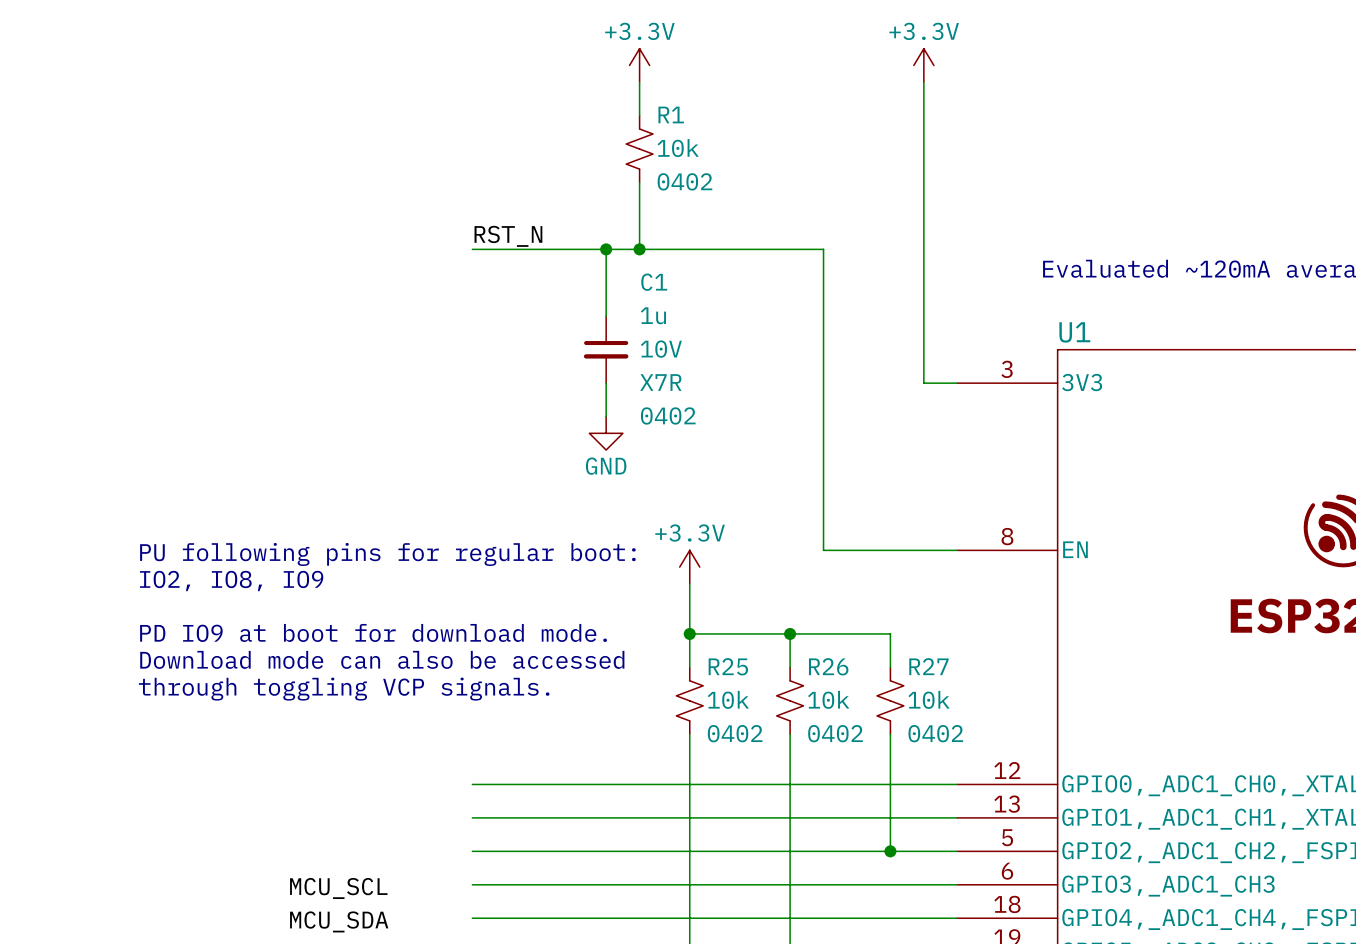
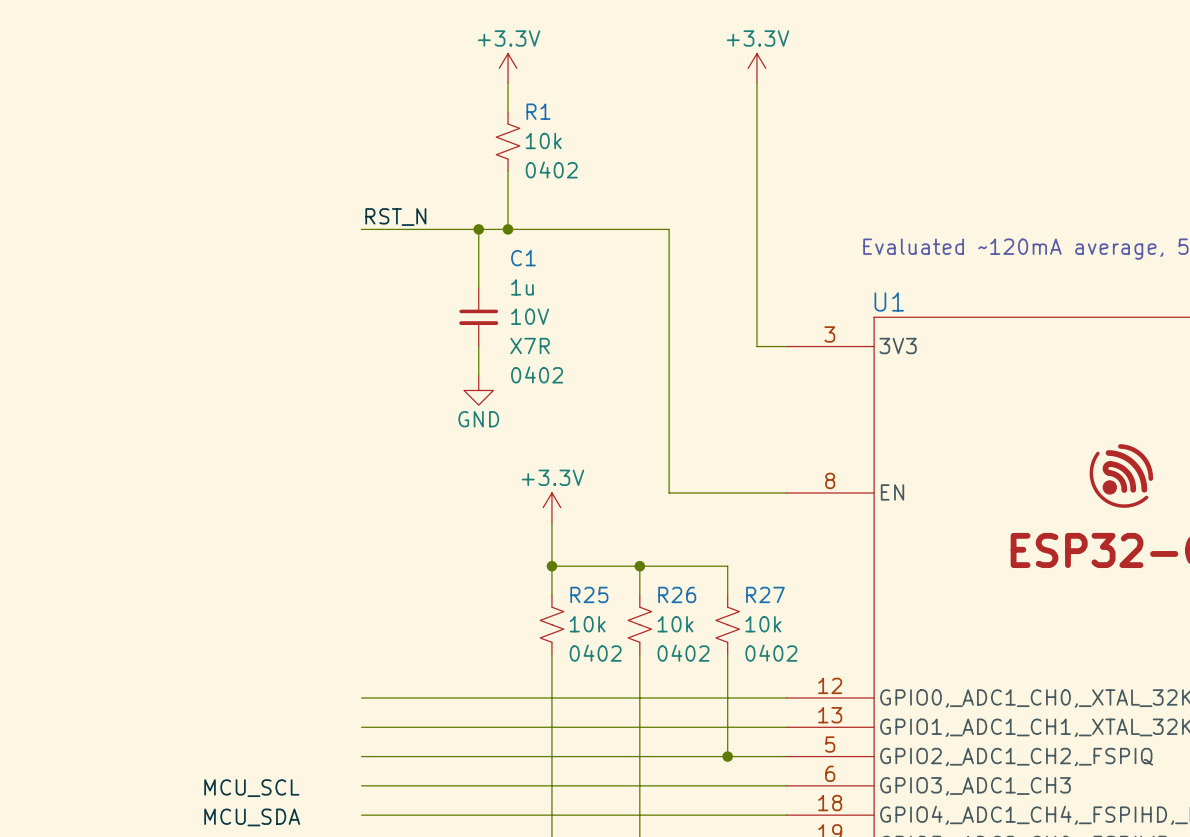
text: PU following pins for regular boot: (387, 554) -> none
text: IO2, IO8, IO9 (231, 581) -> none
text: PD IO9 at boot for download mode. (373, 632) -> none
text: Download mode can also be accessed (382, 659) -> none
text: through toggling VCP signals. (344, 689) -> none

